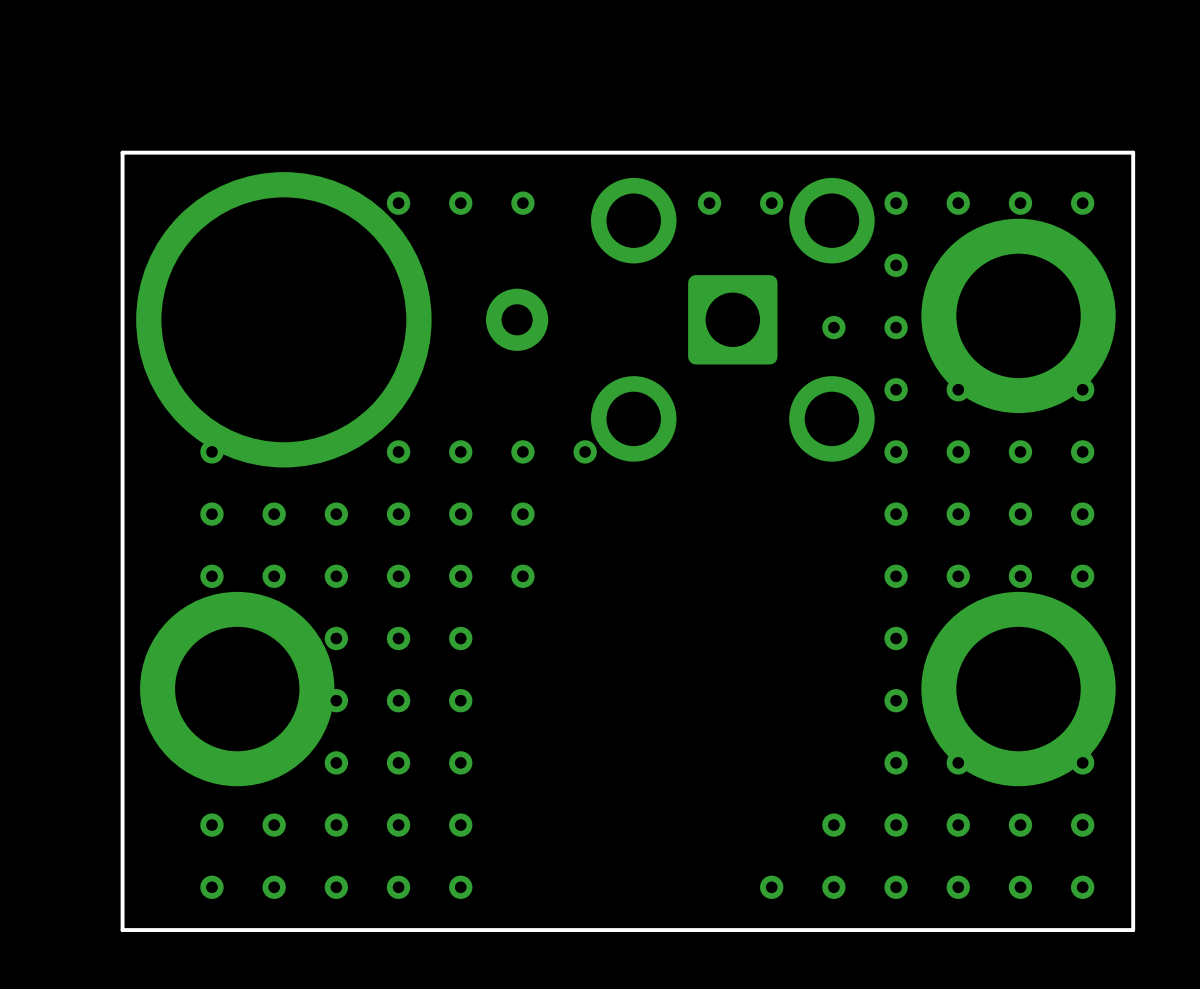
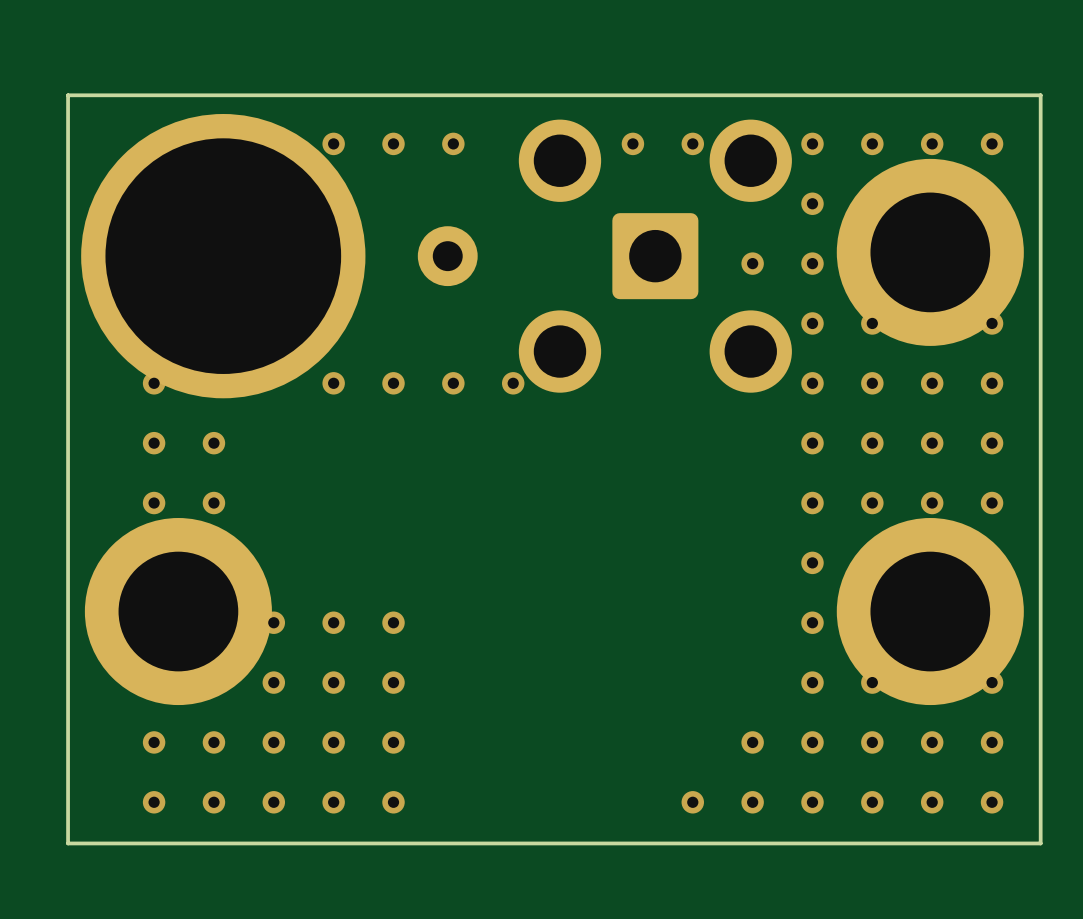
via: (336, 514) -> none
via: (398, 514) -> none
via: (460, 514) -> none
via: (522, 514) -> none
via: (336, 576) -> none
via: (398, 576) -> none
via: (460, 576) -> none
via: (522, 576) -> none
via: (336, 638) -> none
via: (398, 638) -> none
via: (460, 638) -> none

